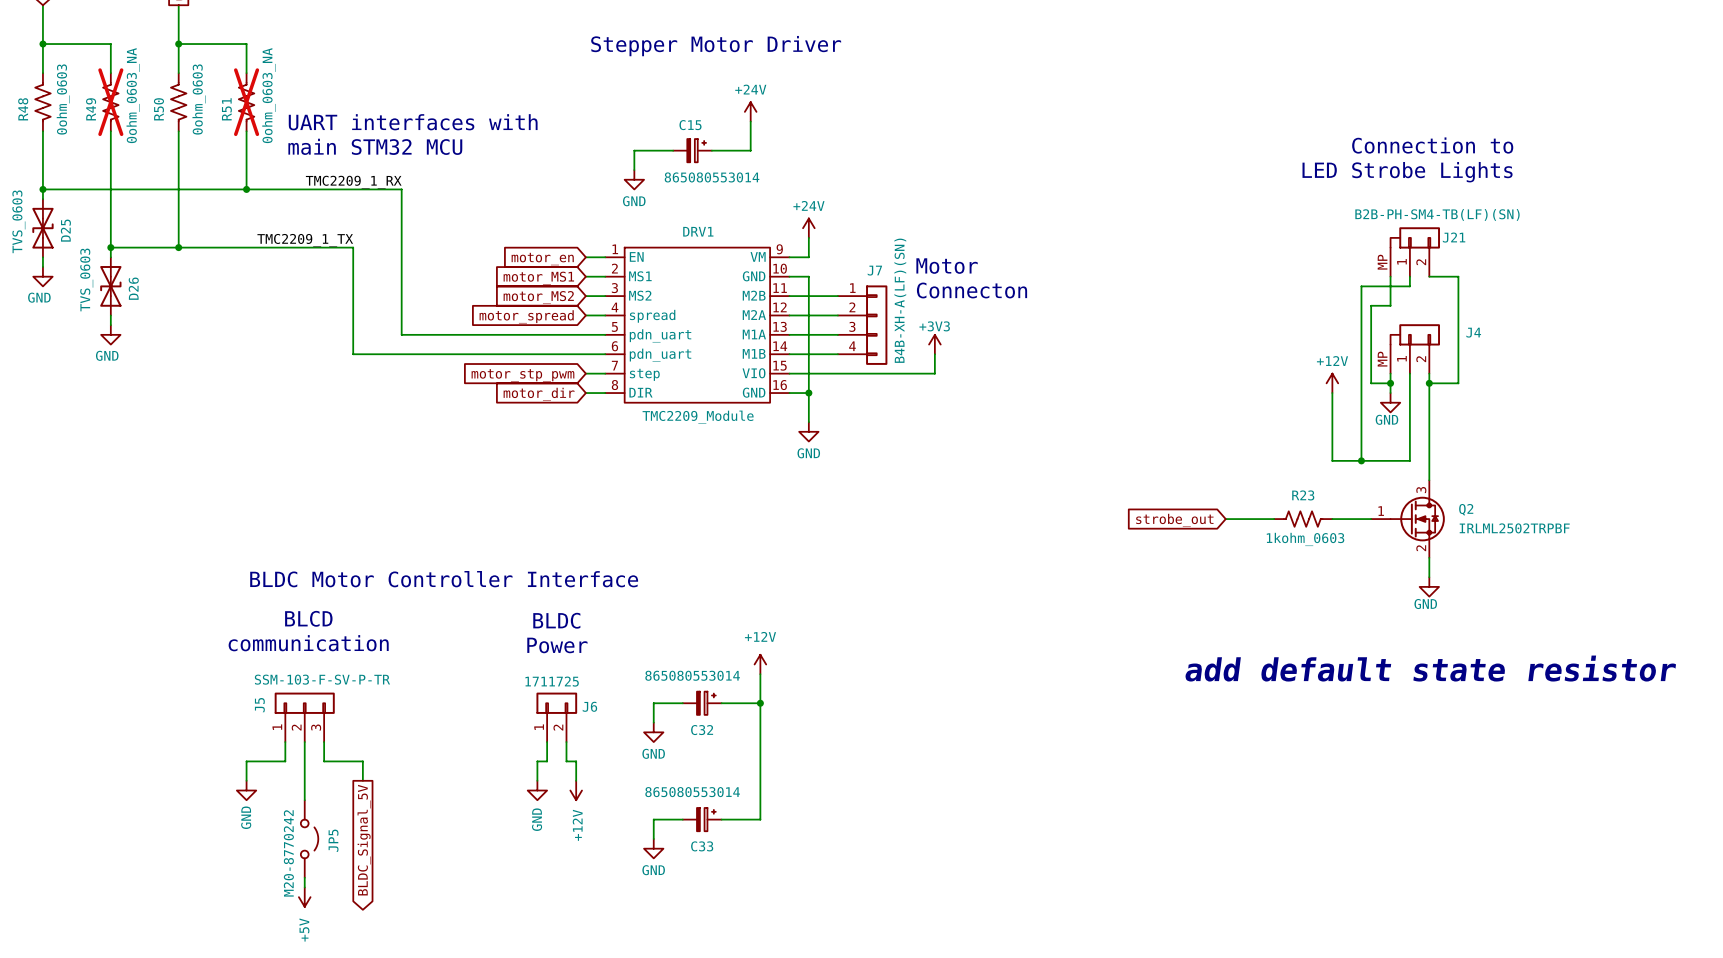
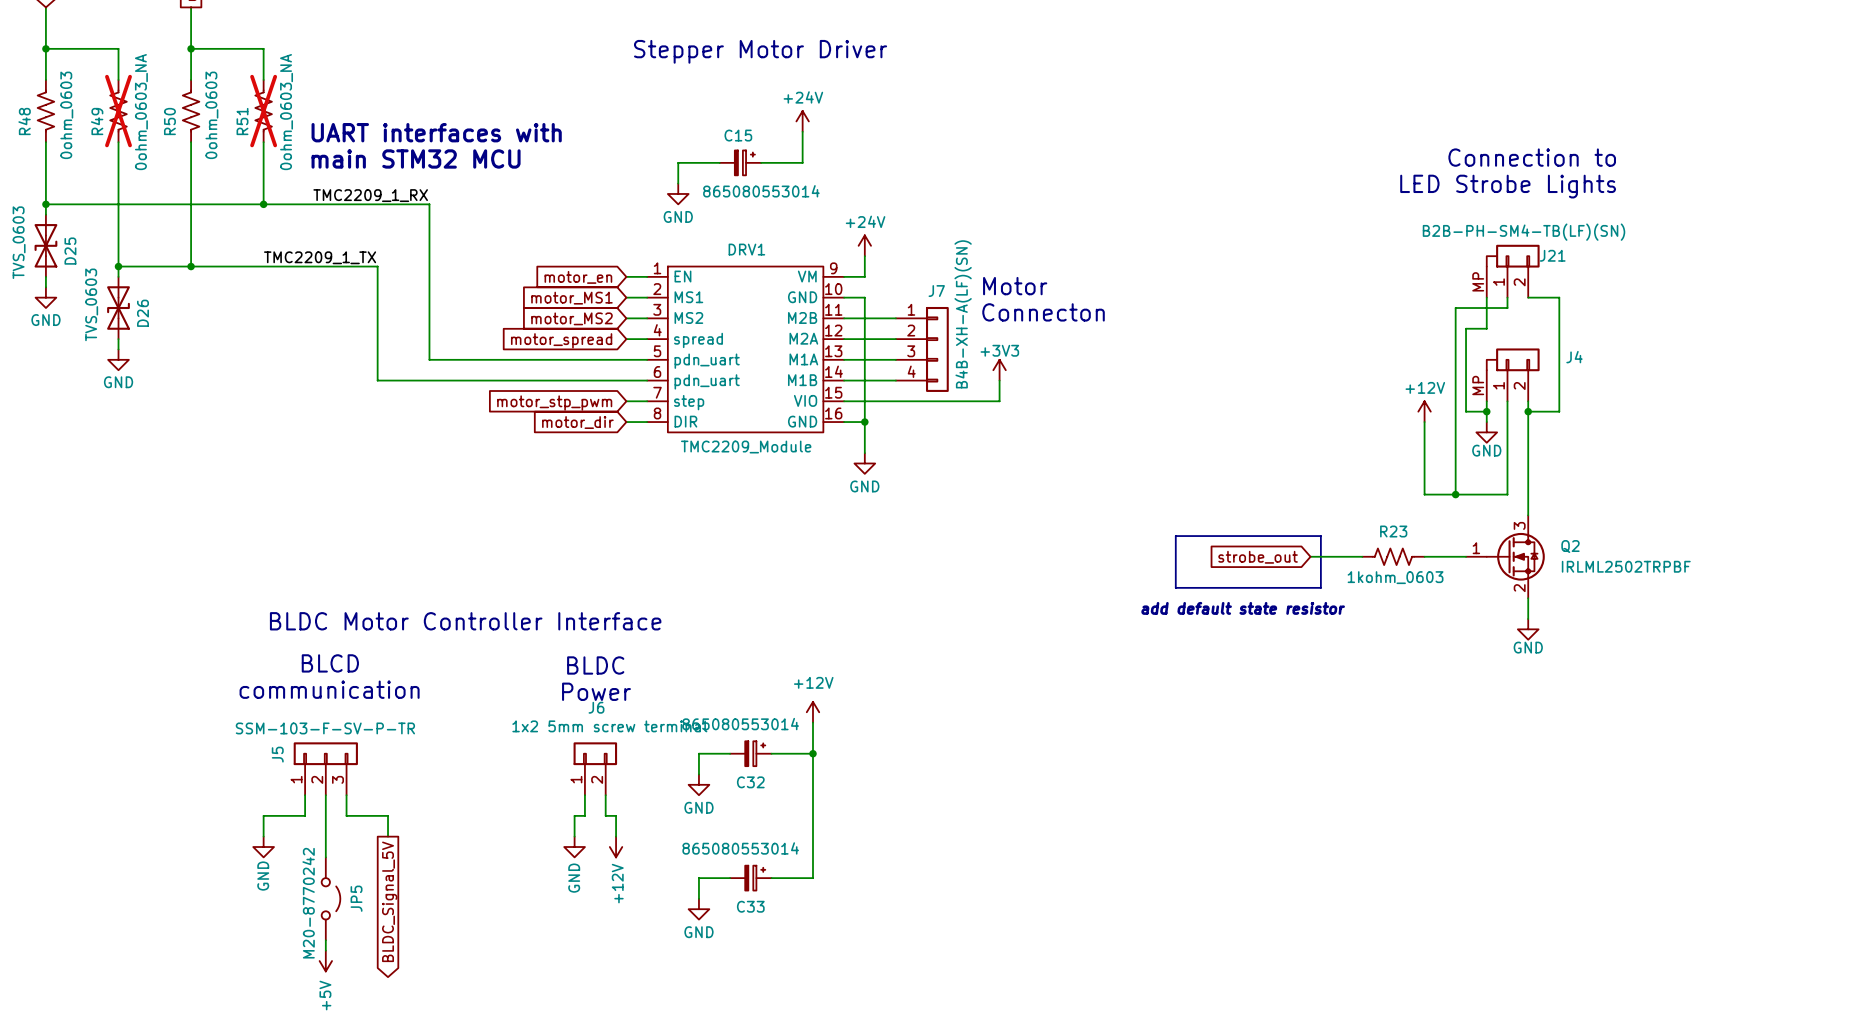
line: none -> (1175, 536) (1320, 536) (1320, 587) (1175, 587) (1175, 536)
text: none -> add default state resistor (1243, 608)
text: add default state resistor (1430, 668) -> none
J6 value: 1711725 (552, 681) -> 1x2 5mm screw terminal (609, 726)
J6 name position: J6 (589, 706) -> J6 (596, 707)

